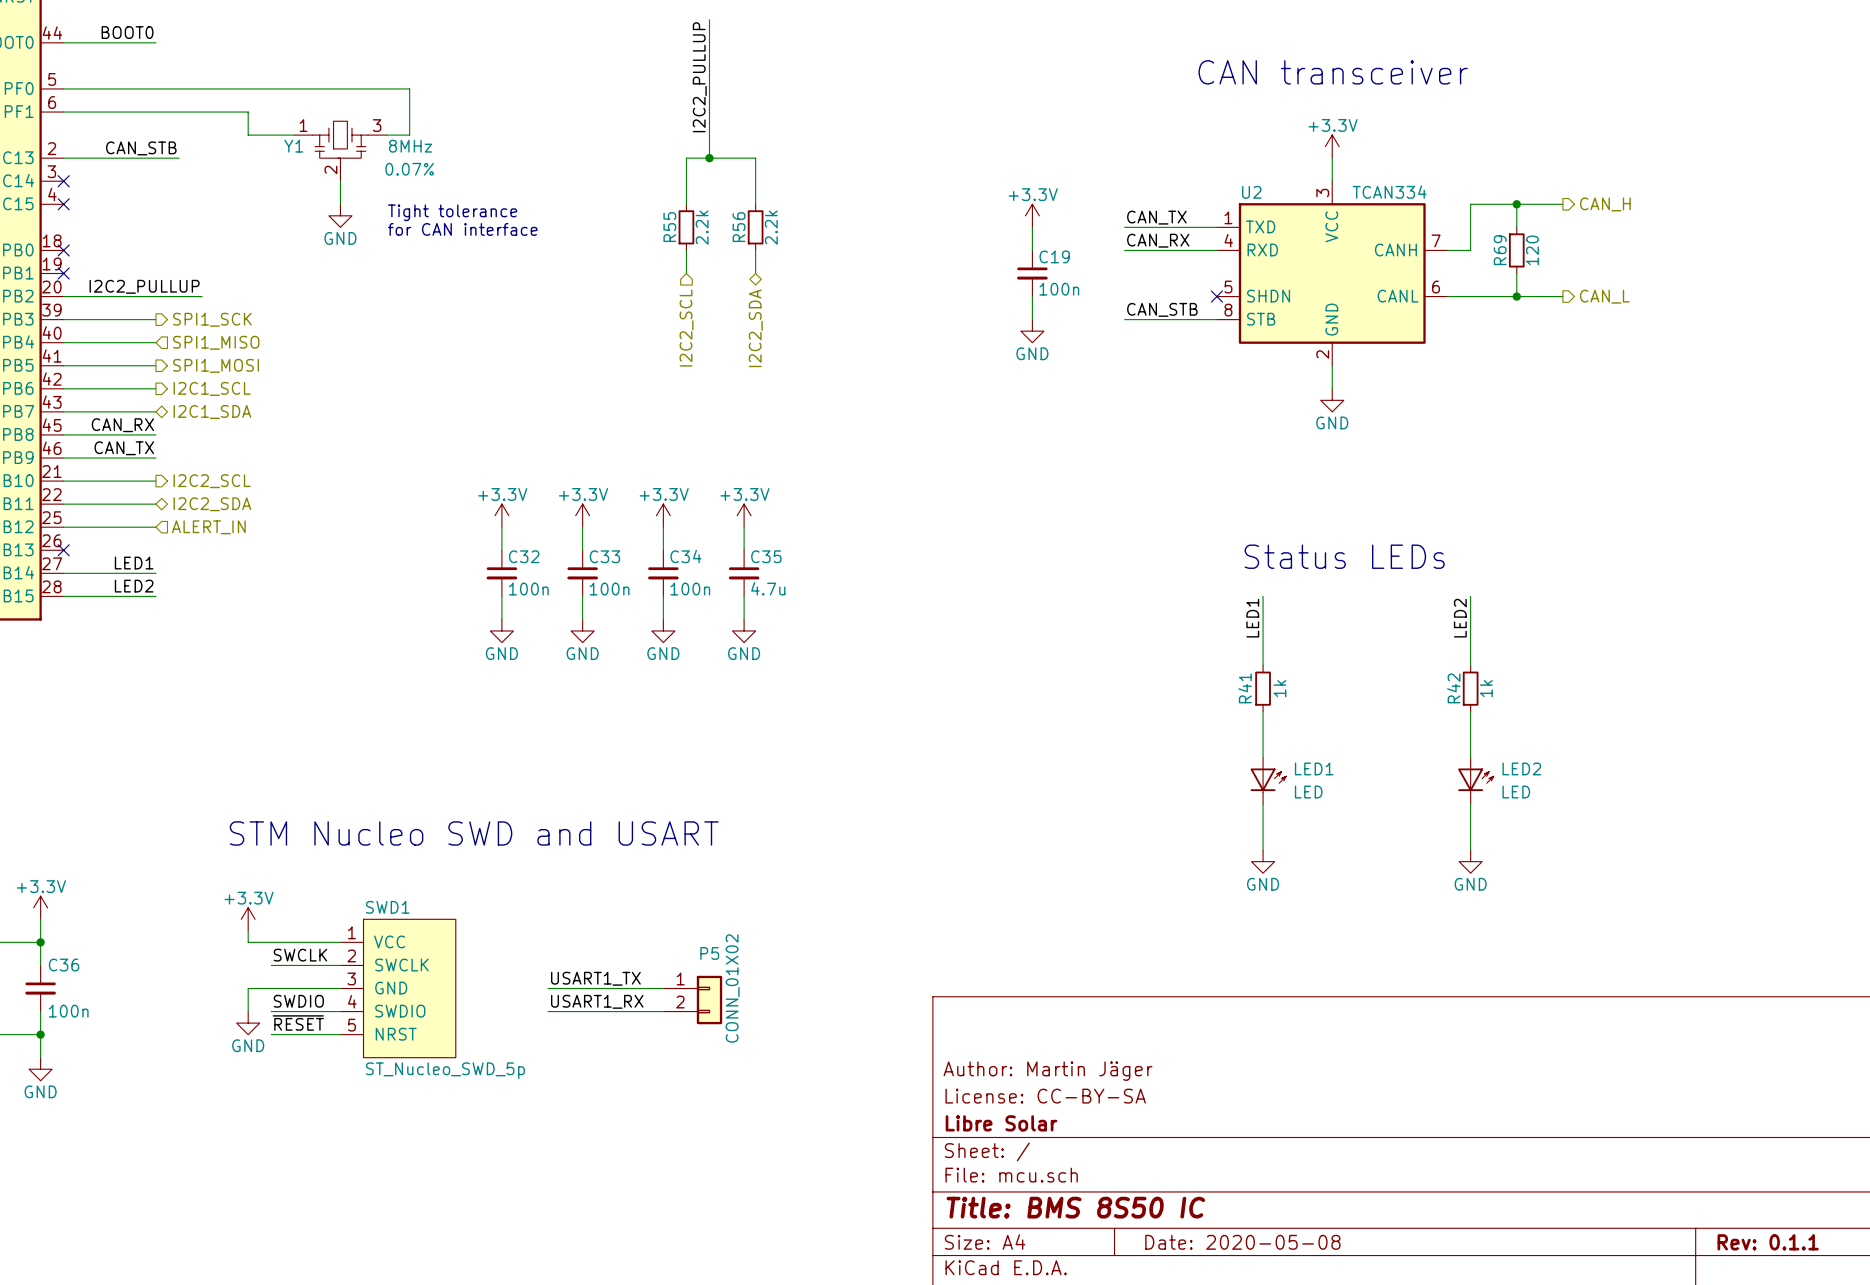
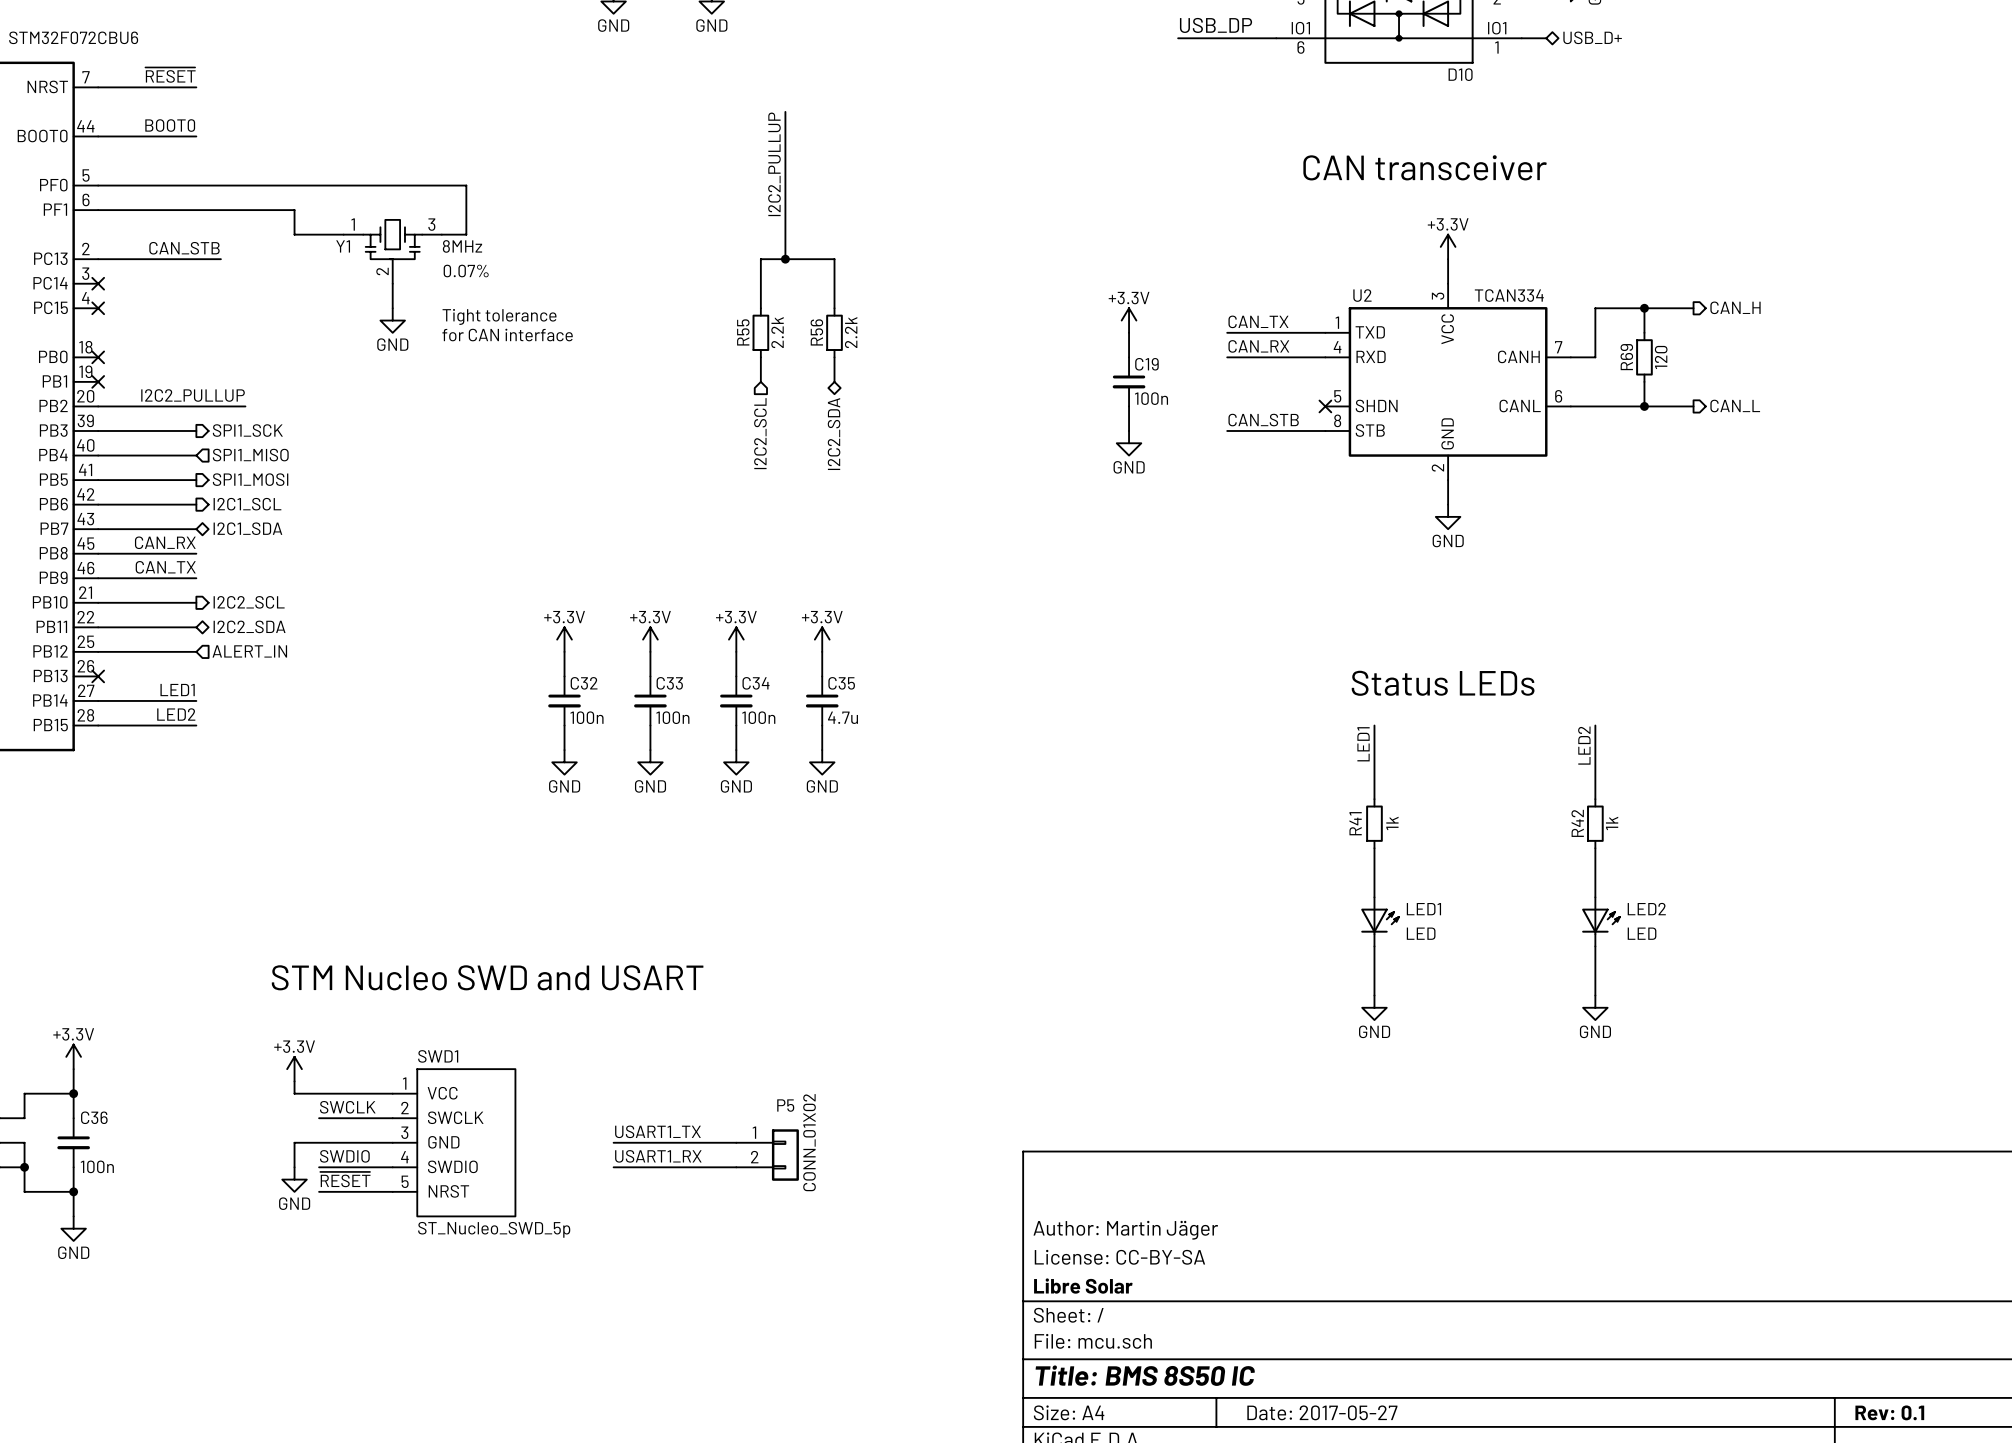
title block: Date: 2020-05-08 (1242, 1242) -> Date: 2017-05-27 (1322, 1412)
title block: Rev: 0.1.1 (1768, 1242) -> Rev: 0.1 (1889, 1412)

